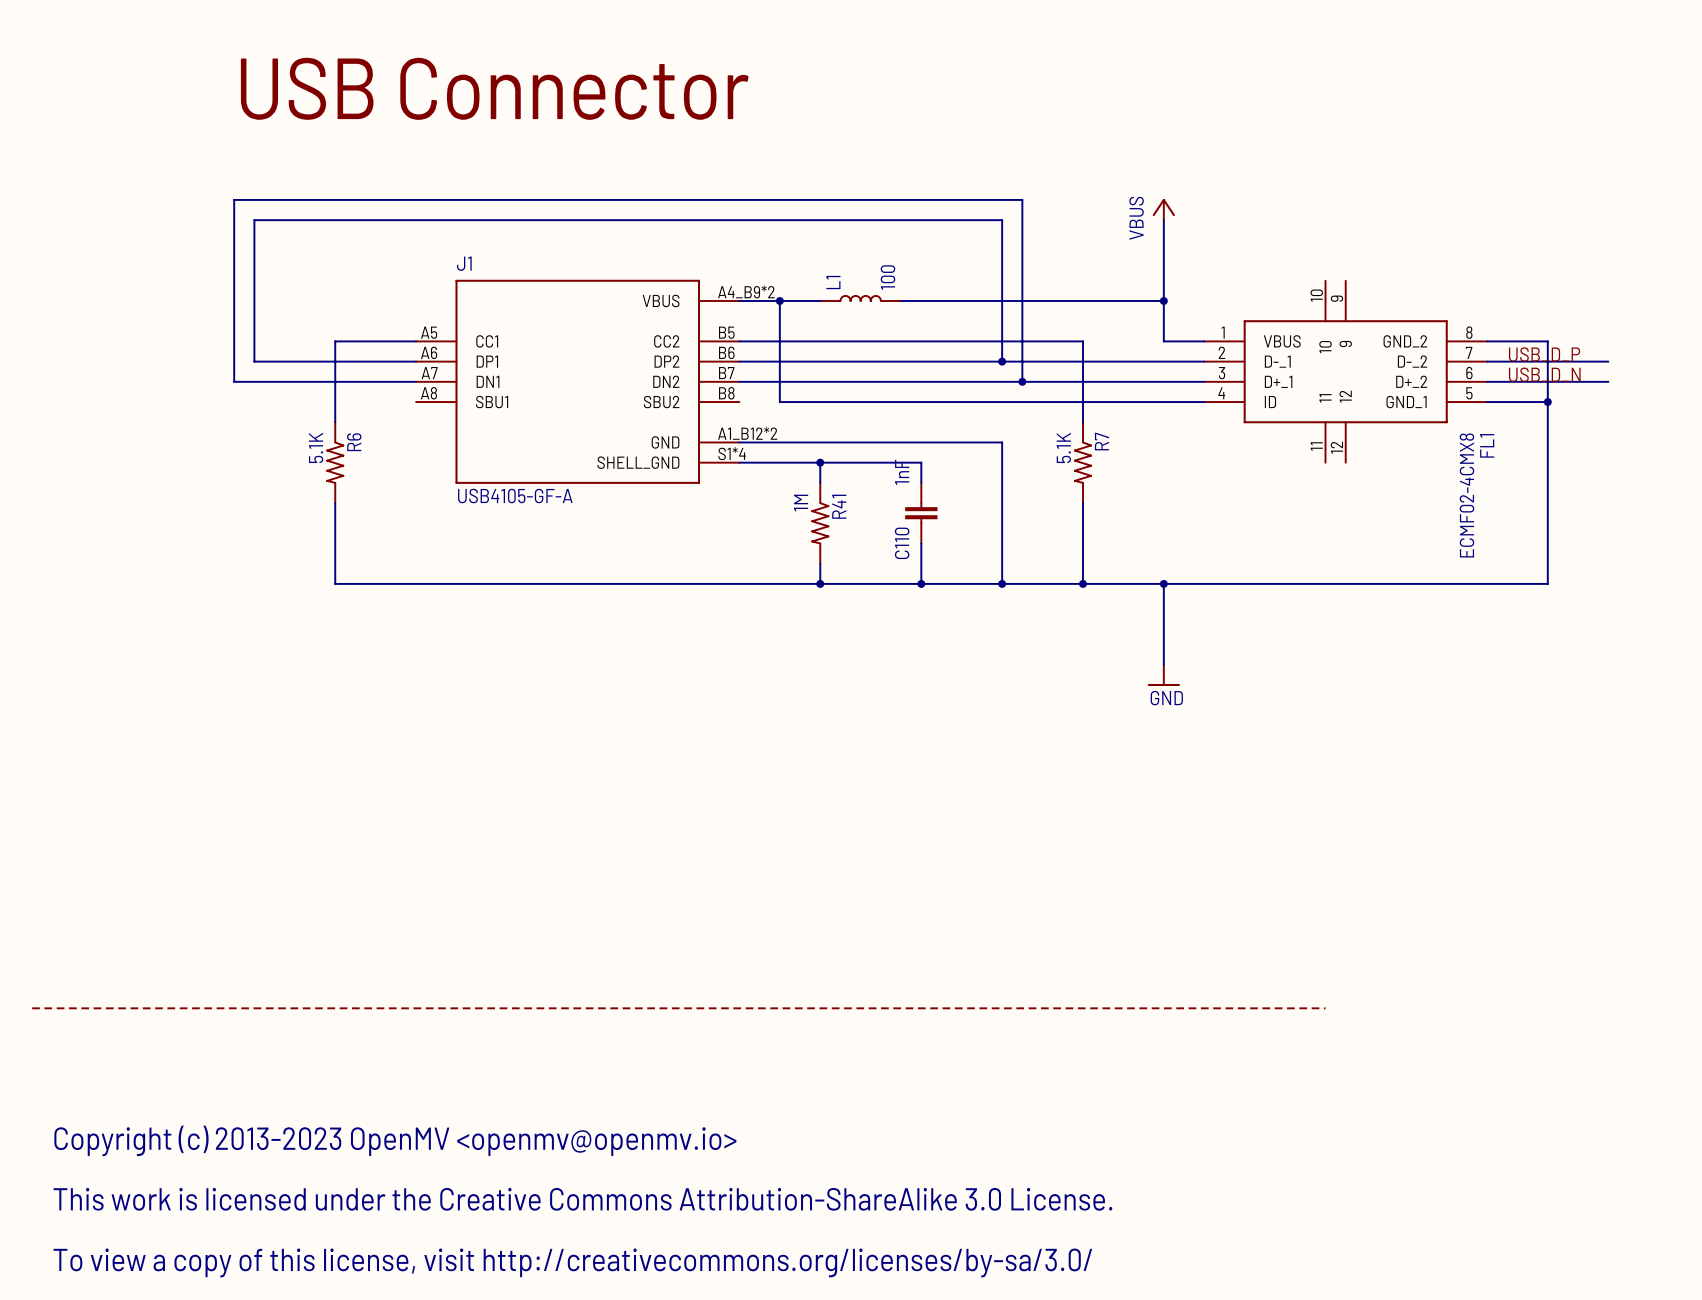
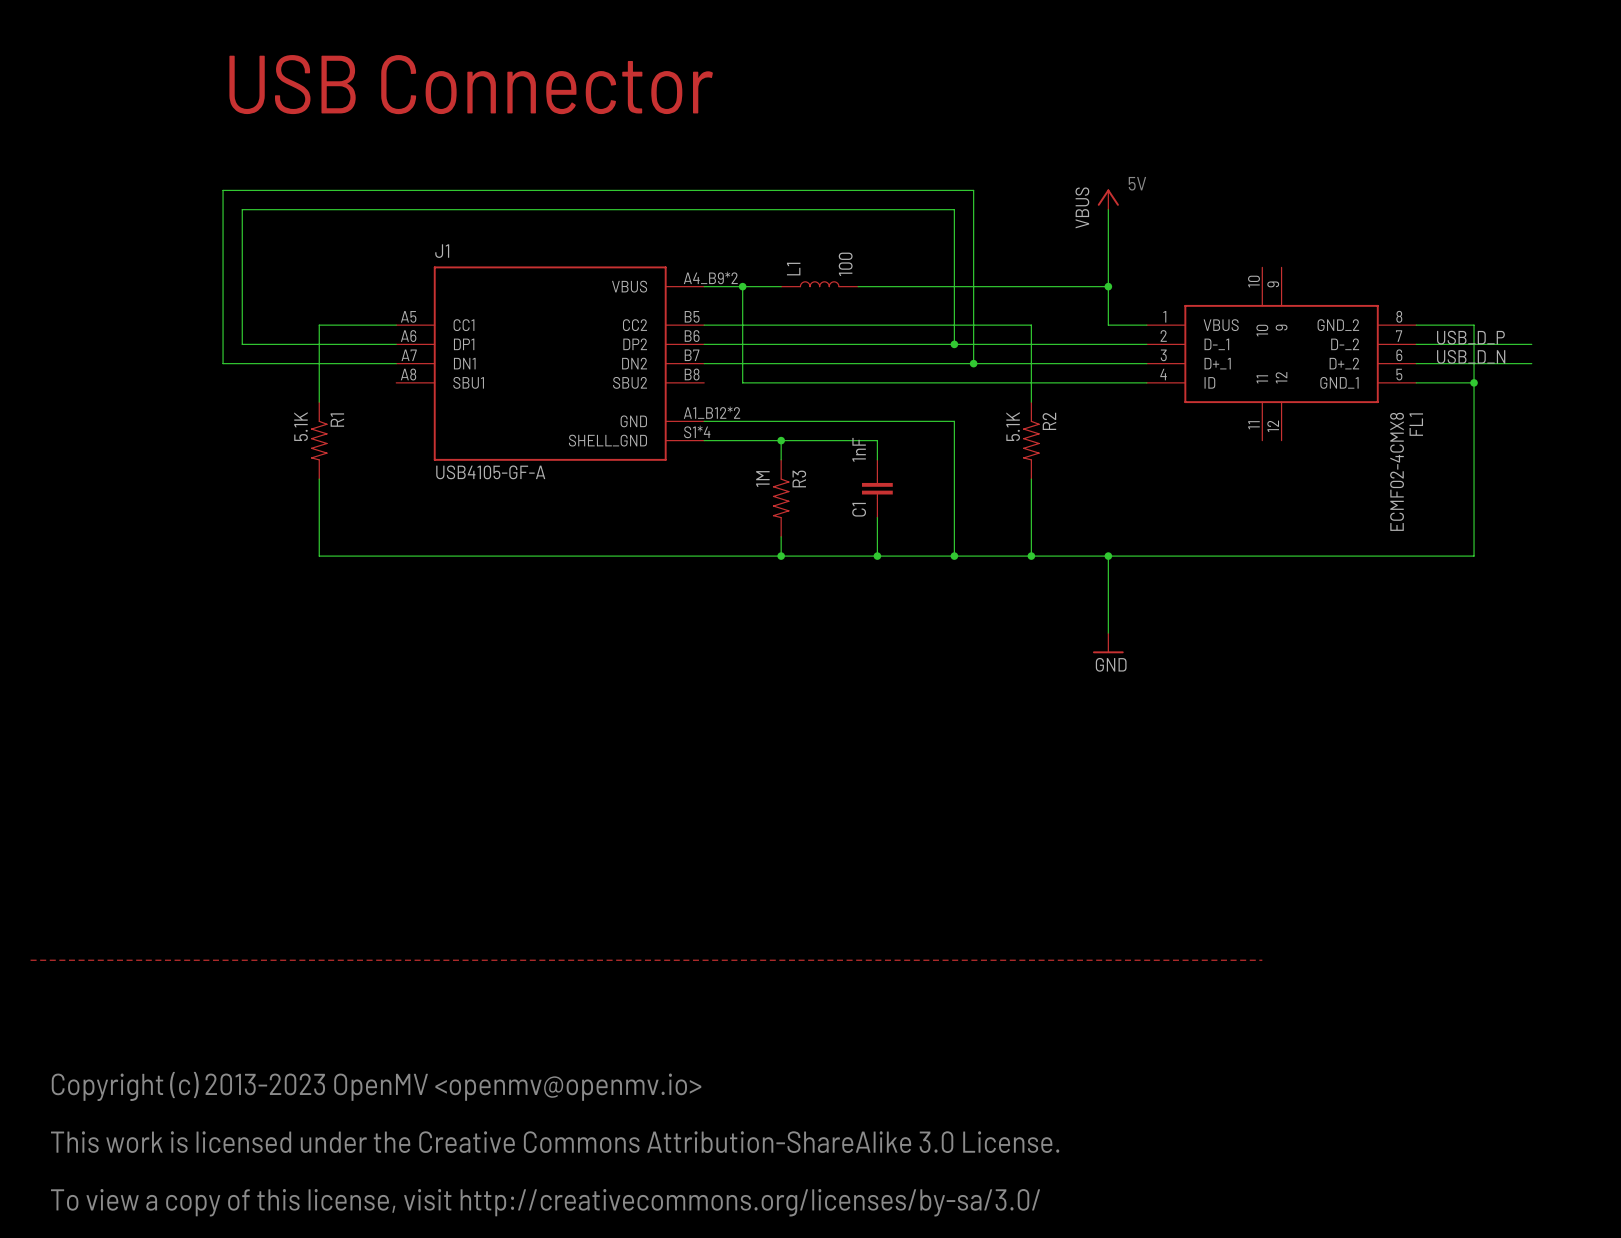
text: none -> 5V (1137, 183)
R7 name: R7 (1101, 441) -> R2 (1049, 421)
R6 name: R6 (354, 442) -> R1 (337, 420)
R41 name: R41 (839, 506) -> R3 (799, 478)
C110 name: C110 (902, 543) -> C1 (859, 509)

